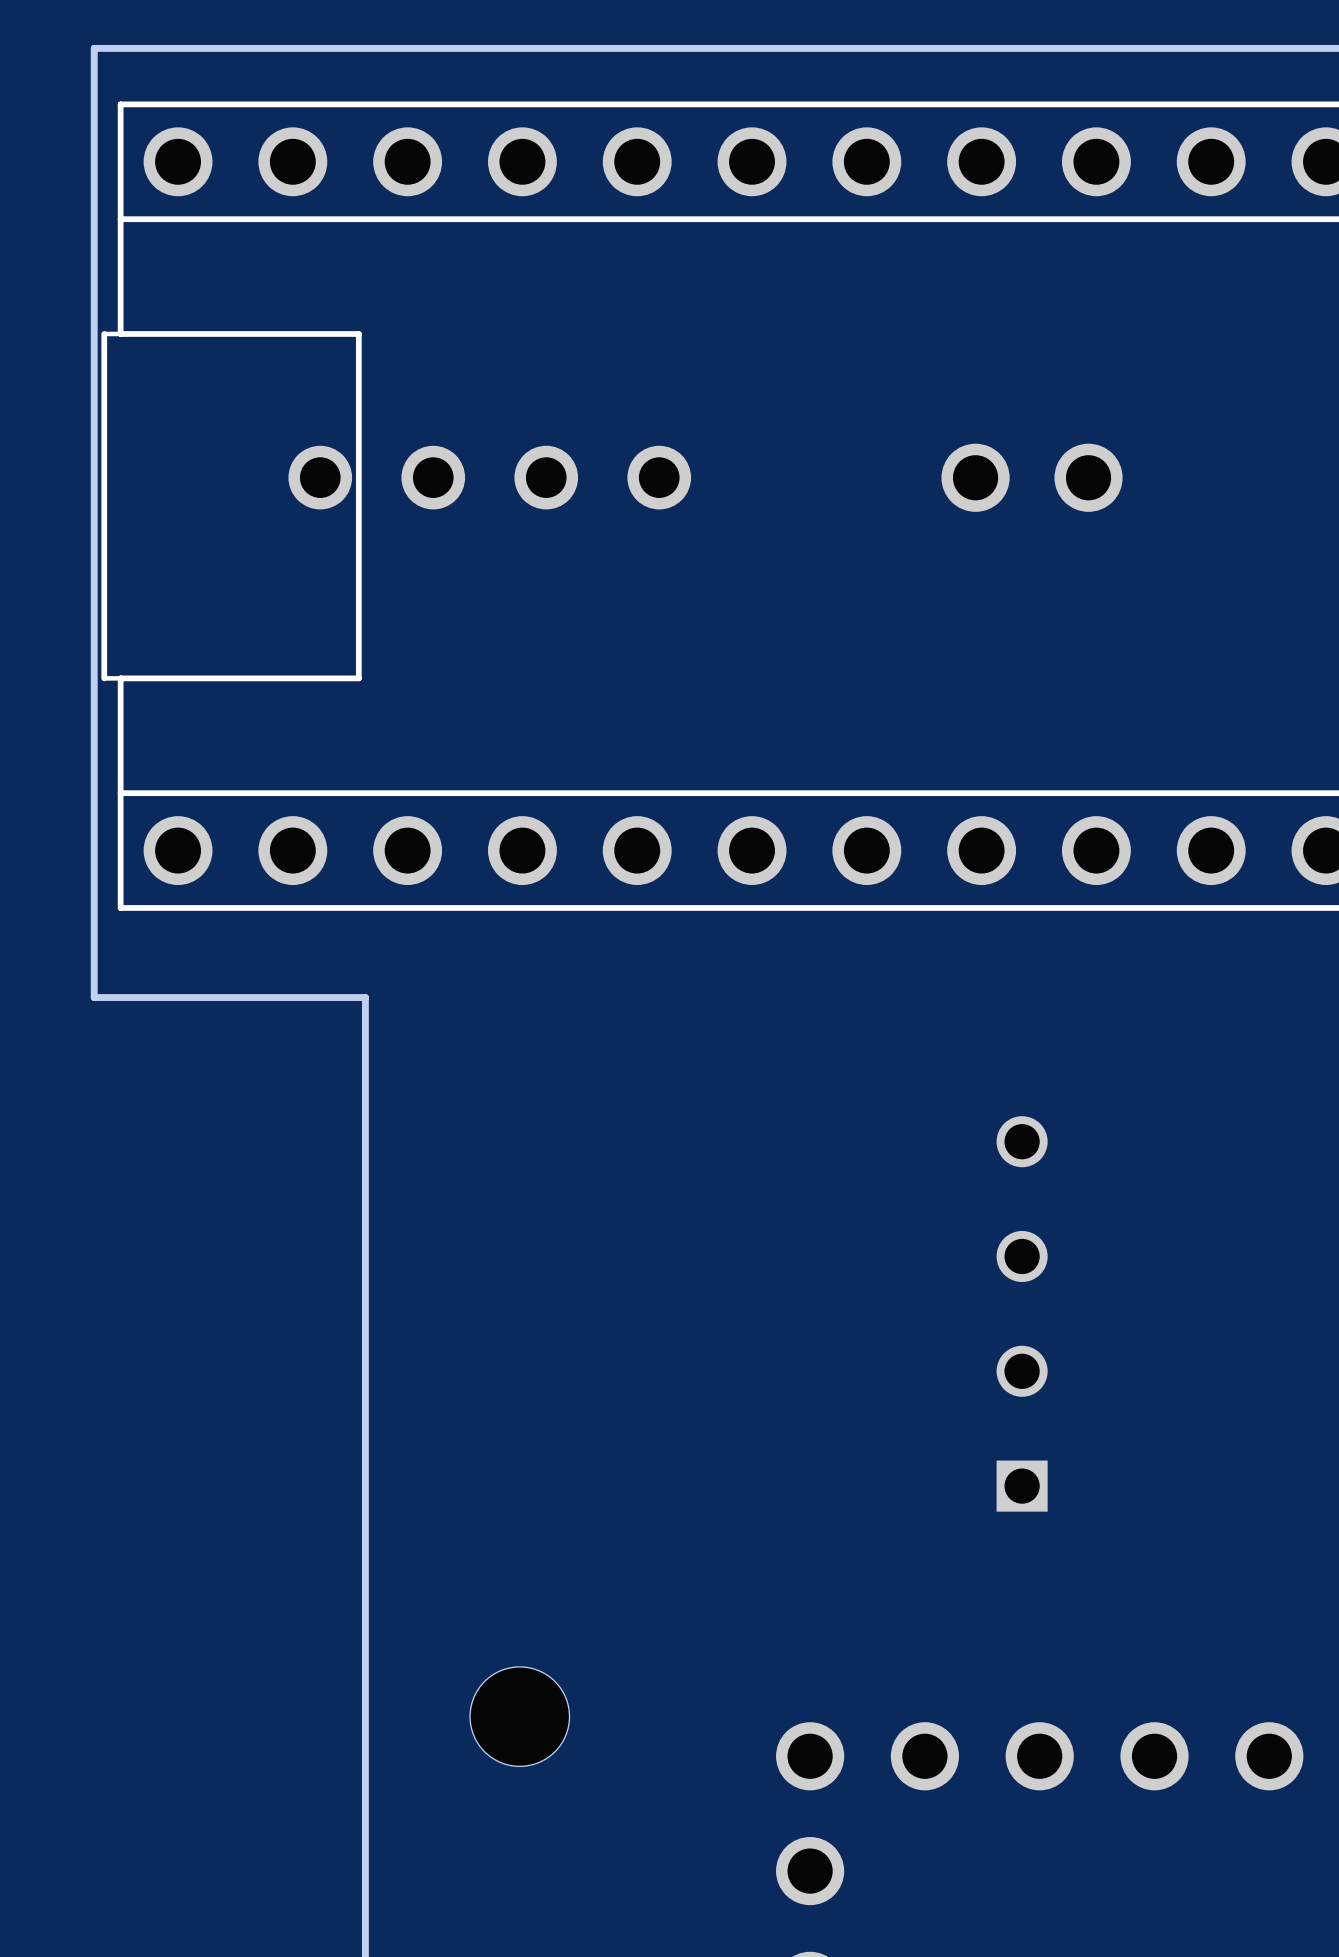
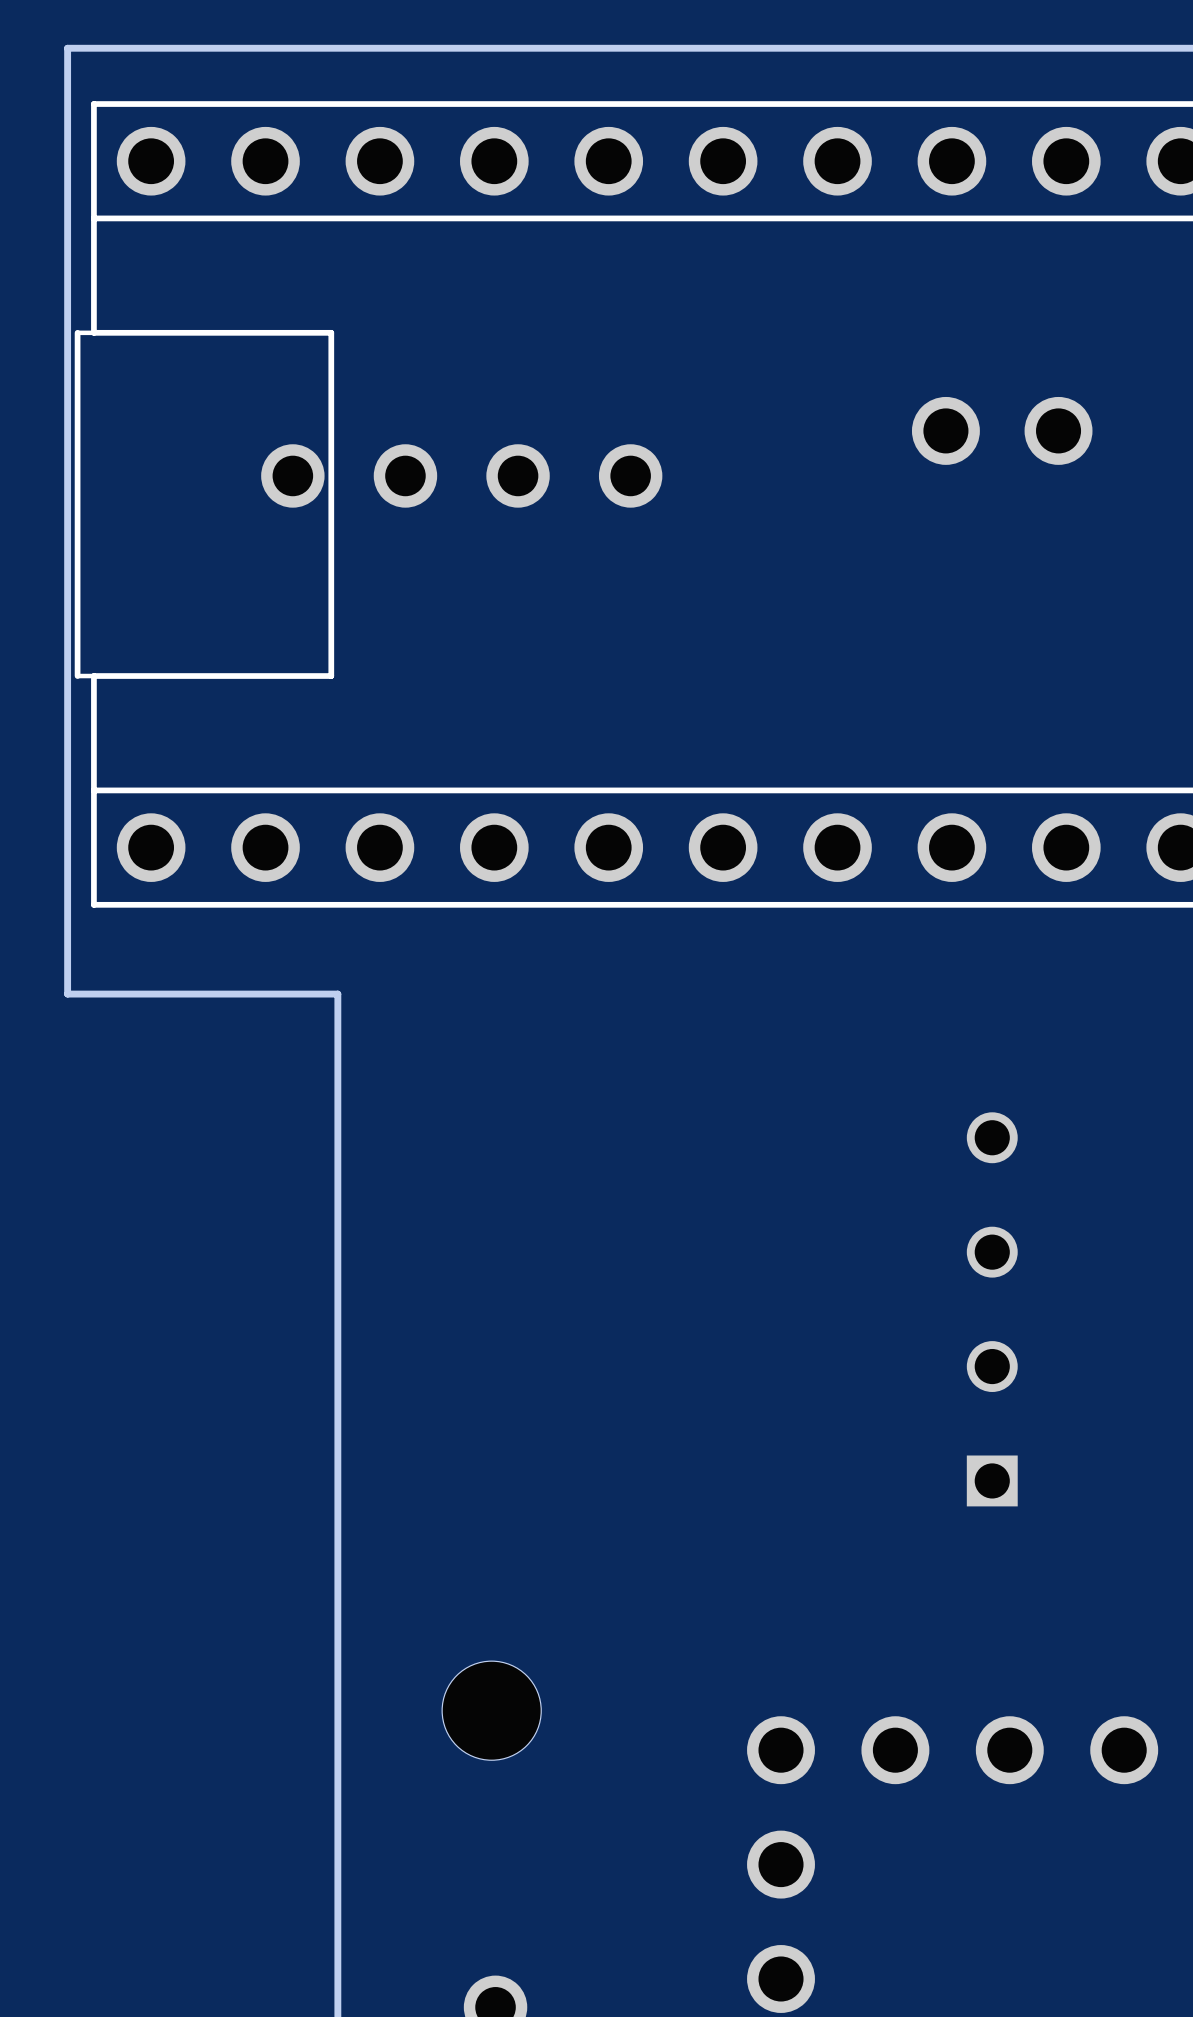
part position: (1032, 477) -> (1002, 430)

